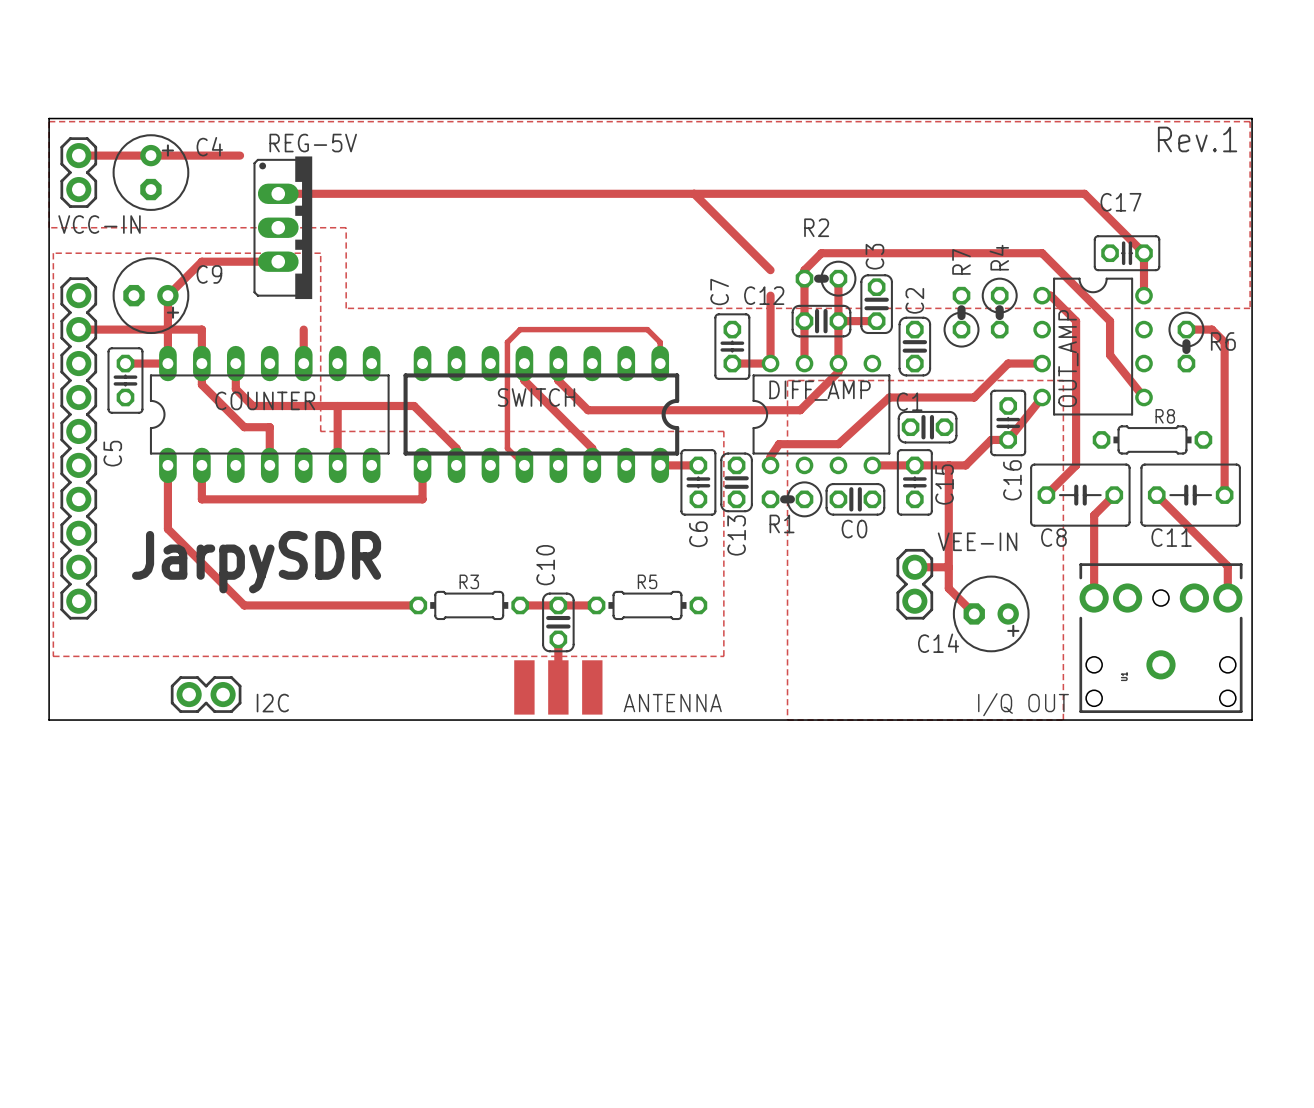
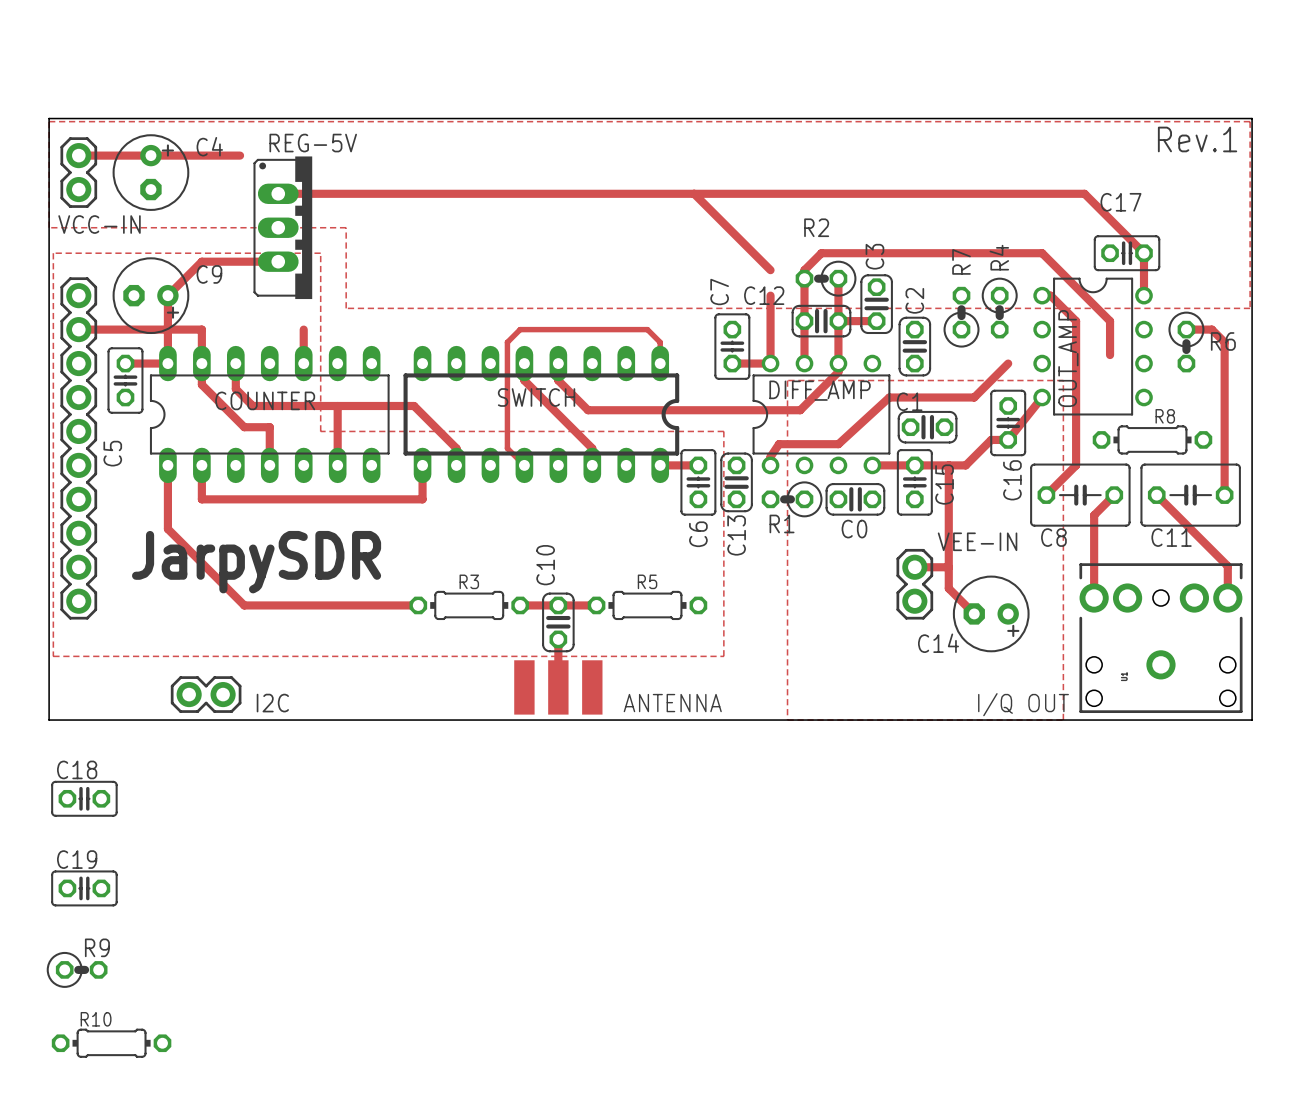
track: (1110, 355) (1144, 397) -> none
track: (1008, 363) (1042, 363) -> none
C18: none -> (84, 798)
C19: none -> (84, 888)
R9: none -> (77, 969)
R10: none -> (111, 1043)

